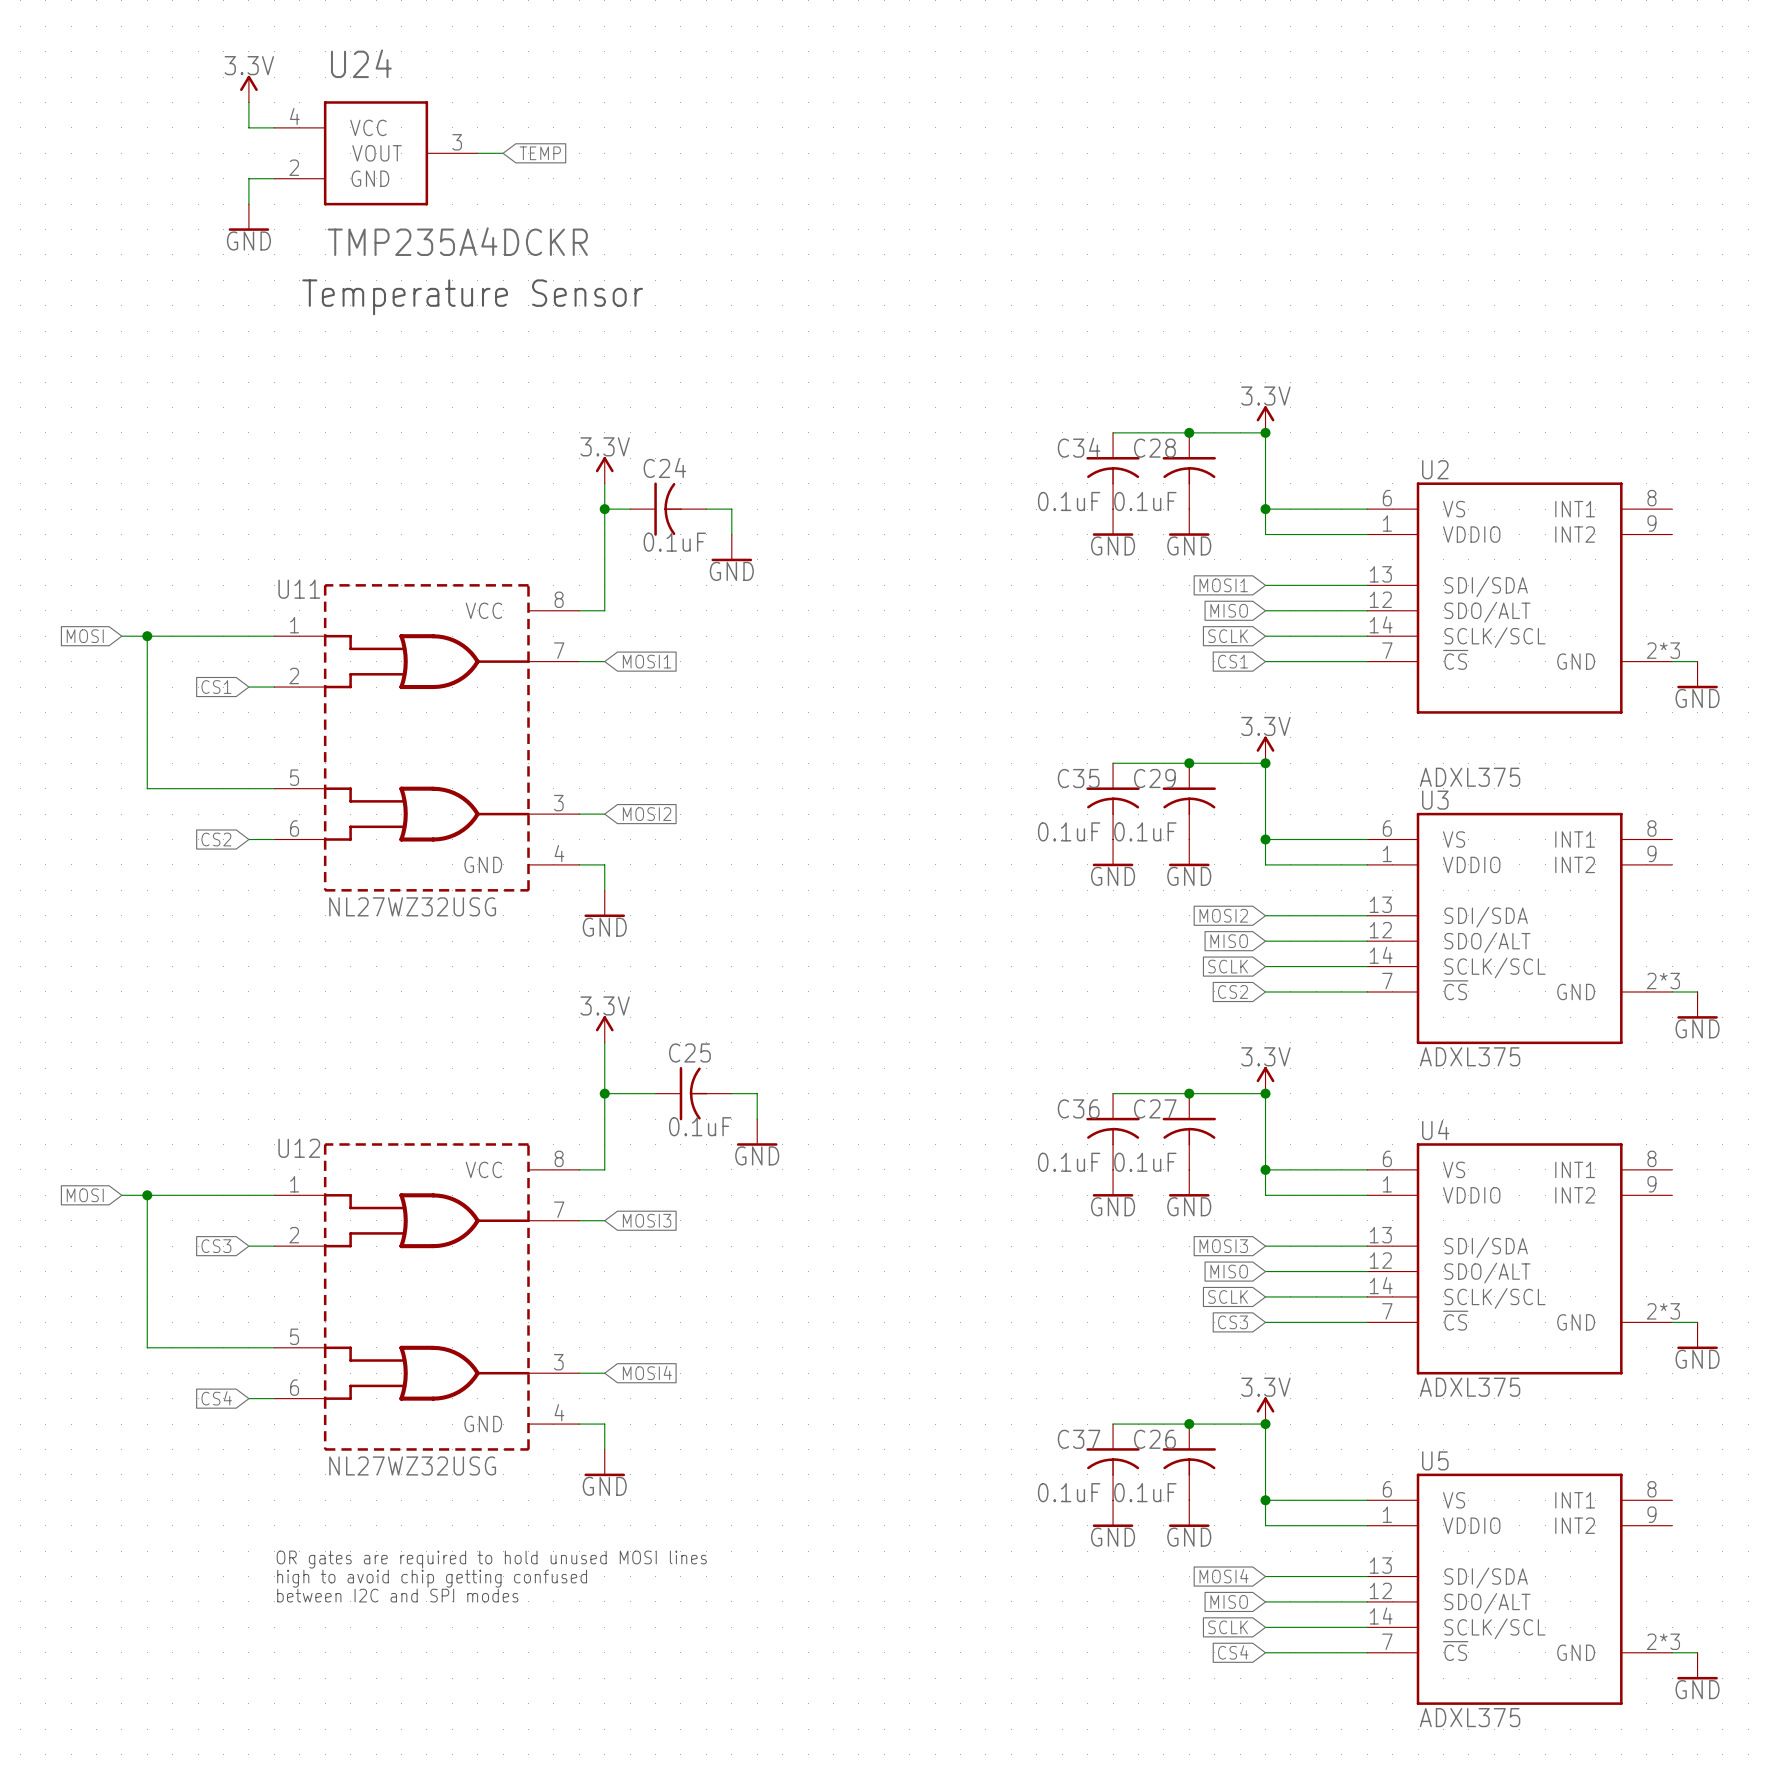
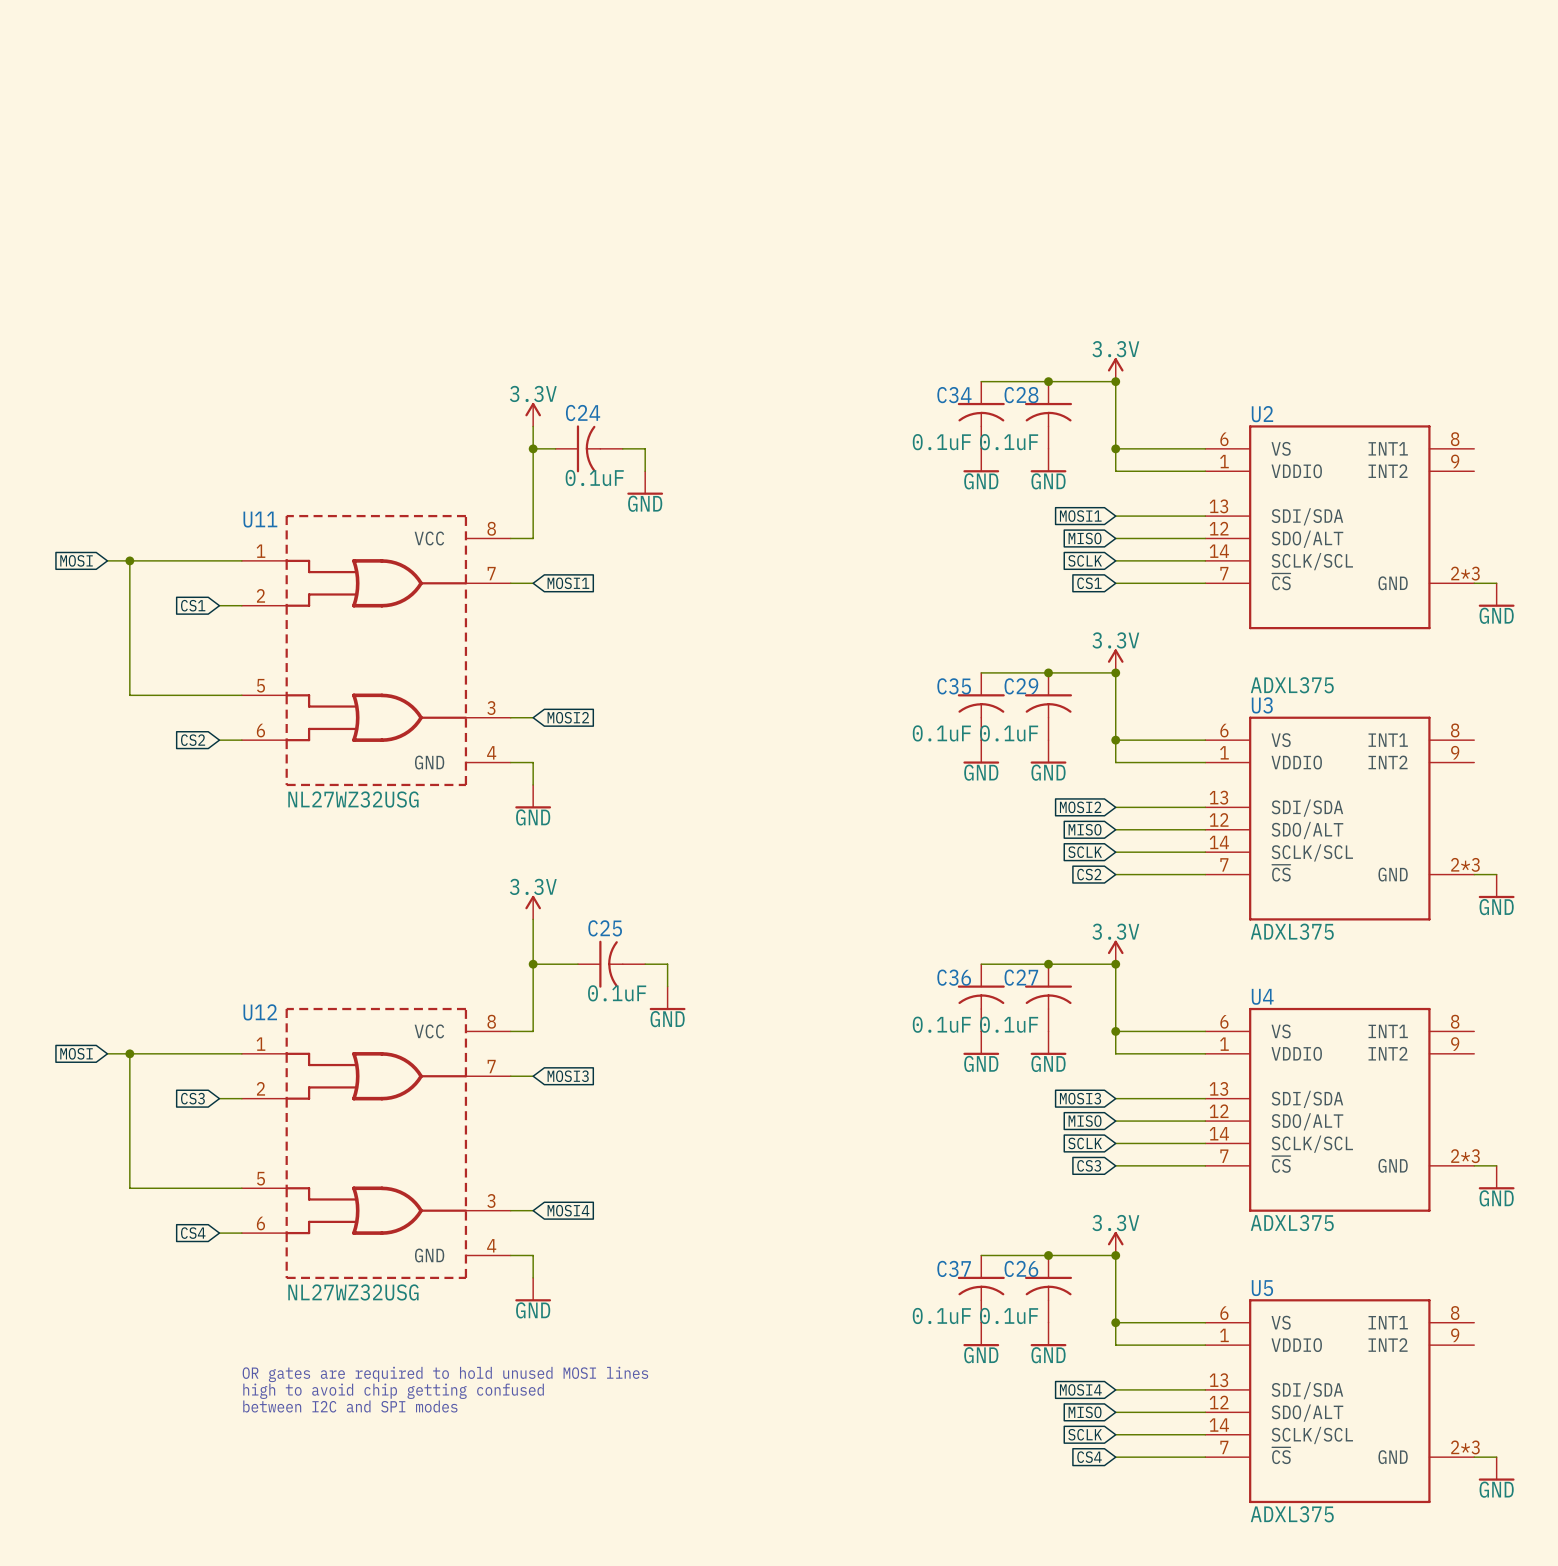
power symbol: 3.3V (248, 89) -> none
wire: (248, 102) (248, 127) (274, 127) -> none
U24: TMP235A4DCKR (376, 153) -> none
wire: (477, 153) (503, 153) -> none
global label: TEMP (540, 153) -> none
wire: (274, 178) (248, 178) (248, 204) -> none
power symbol: GND (248, 217) -> none
text: Temperature Sensor (472, 297) -> none

